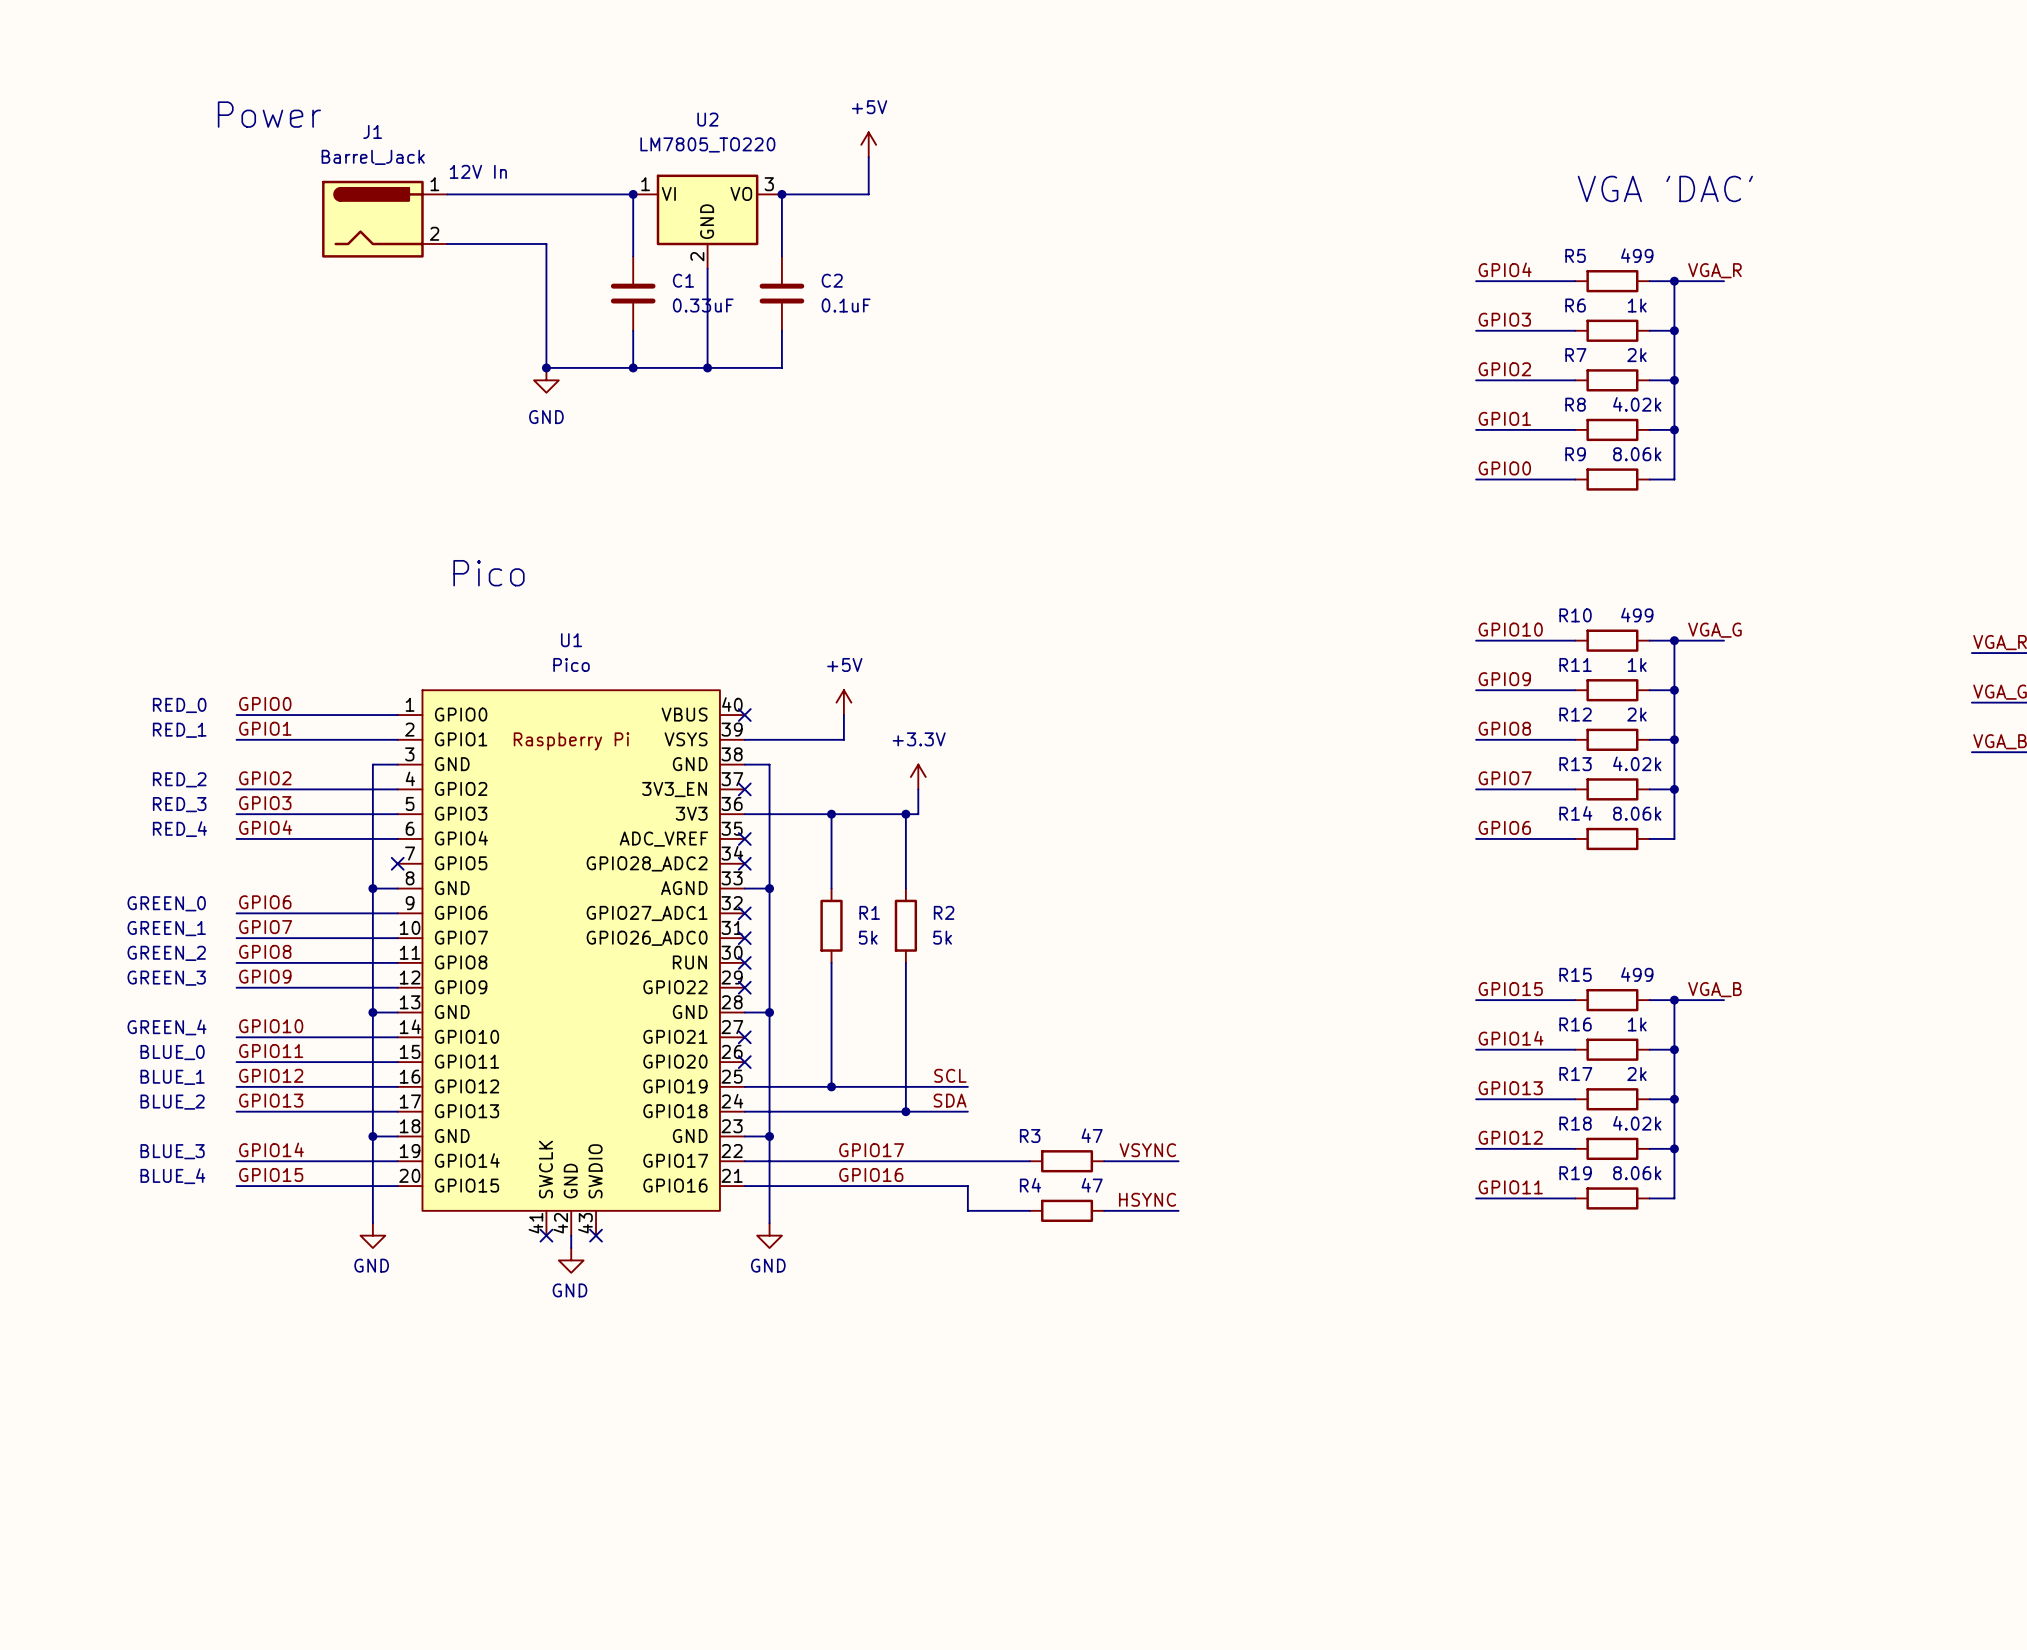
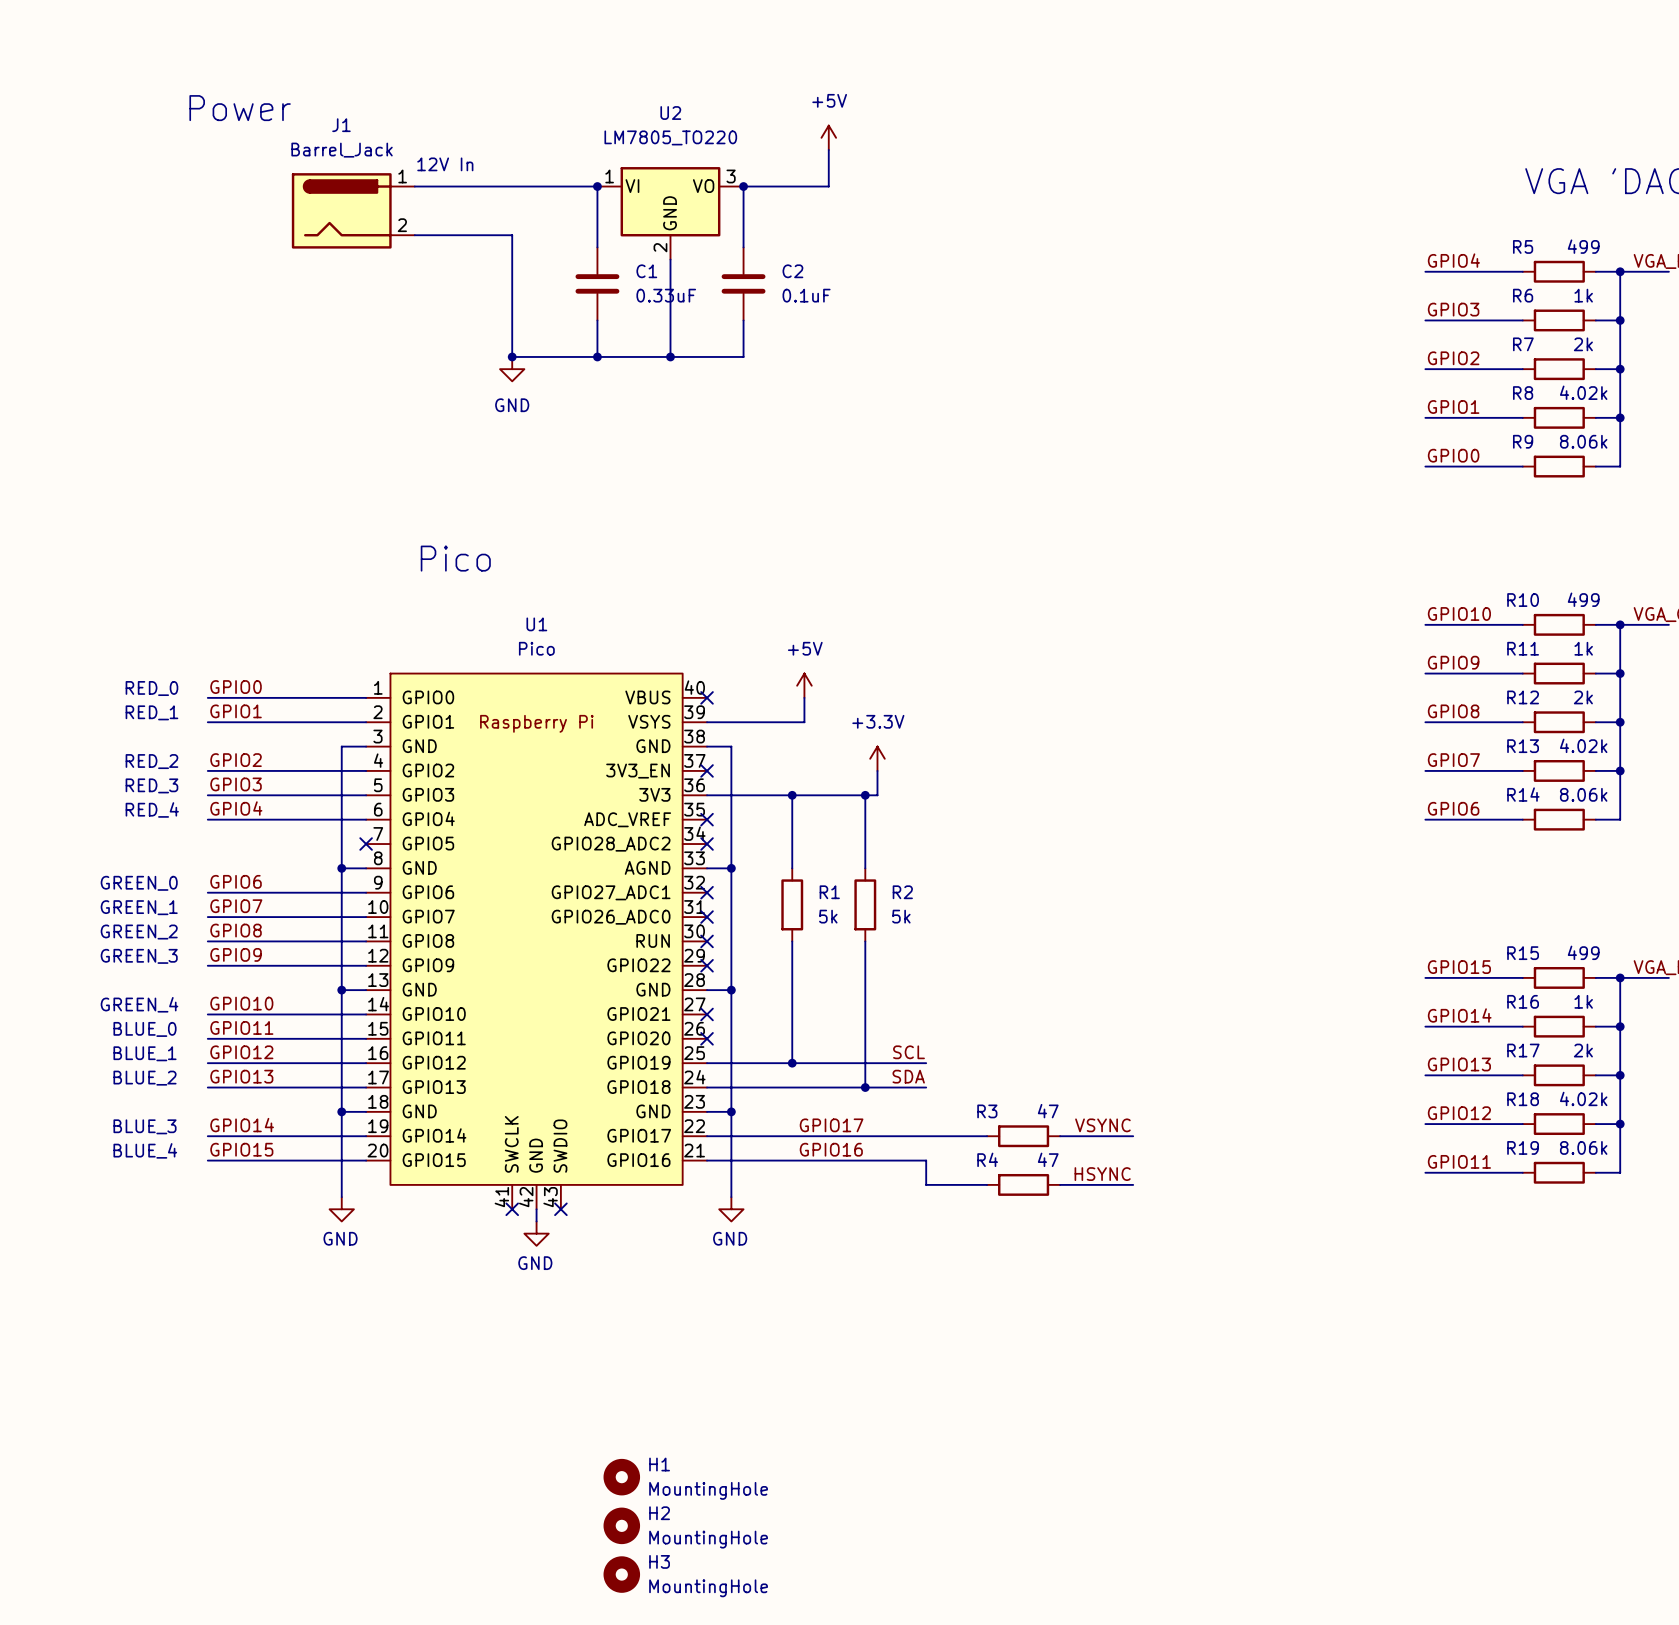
H1: none -> MountingHole (621, 1477)
H2: none -> MountingHole (621, 1525)
H3: none -> MountingHole (621, 1574)

